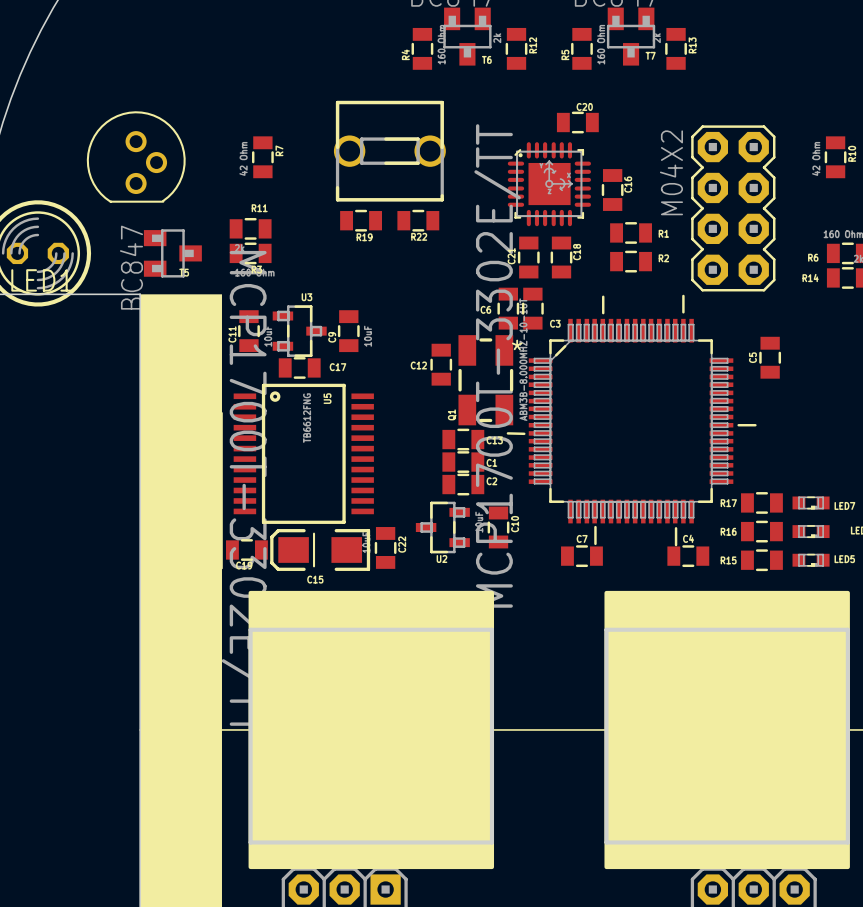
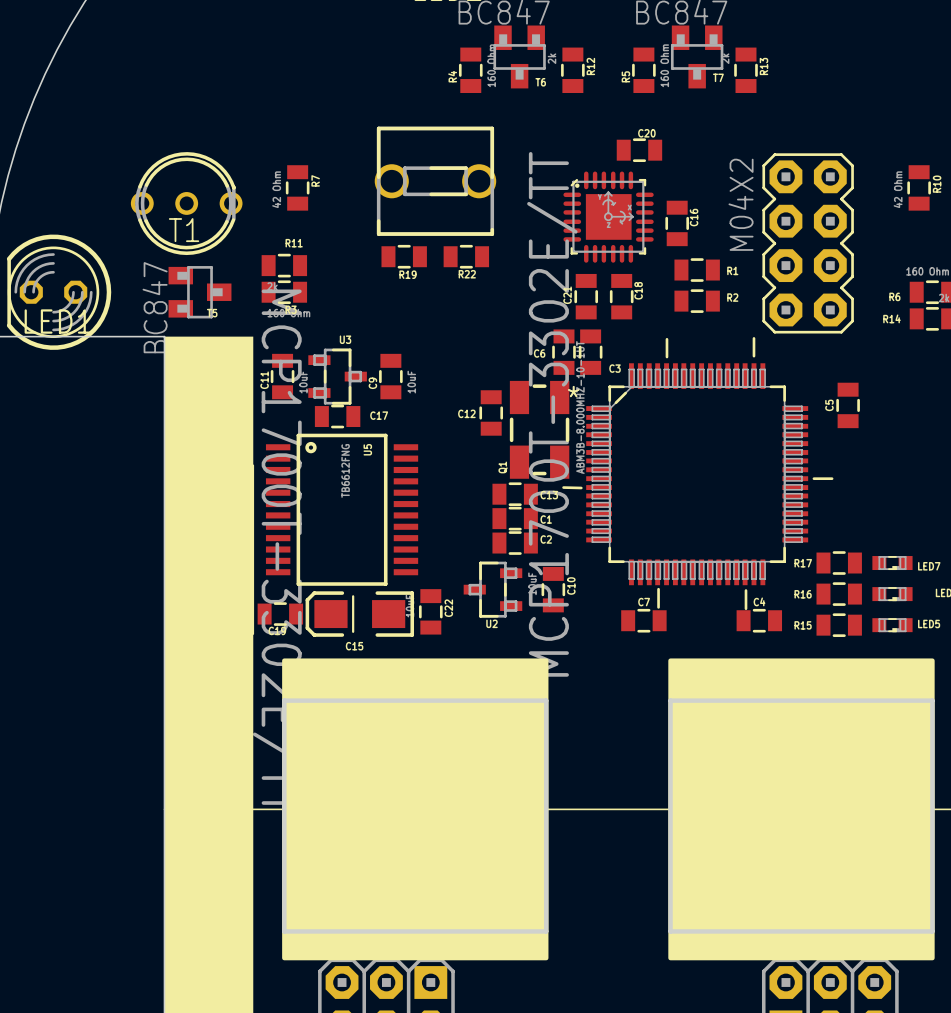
part: (136, 157) -> none
T1: none -> (186, 203)

